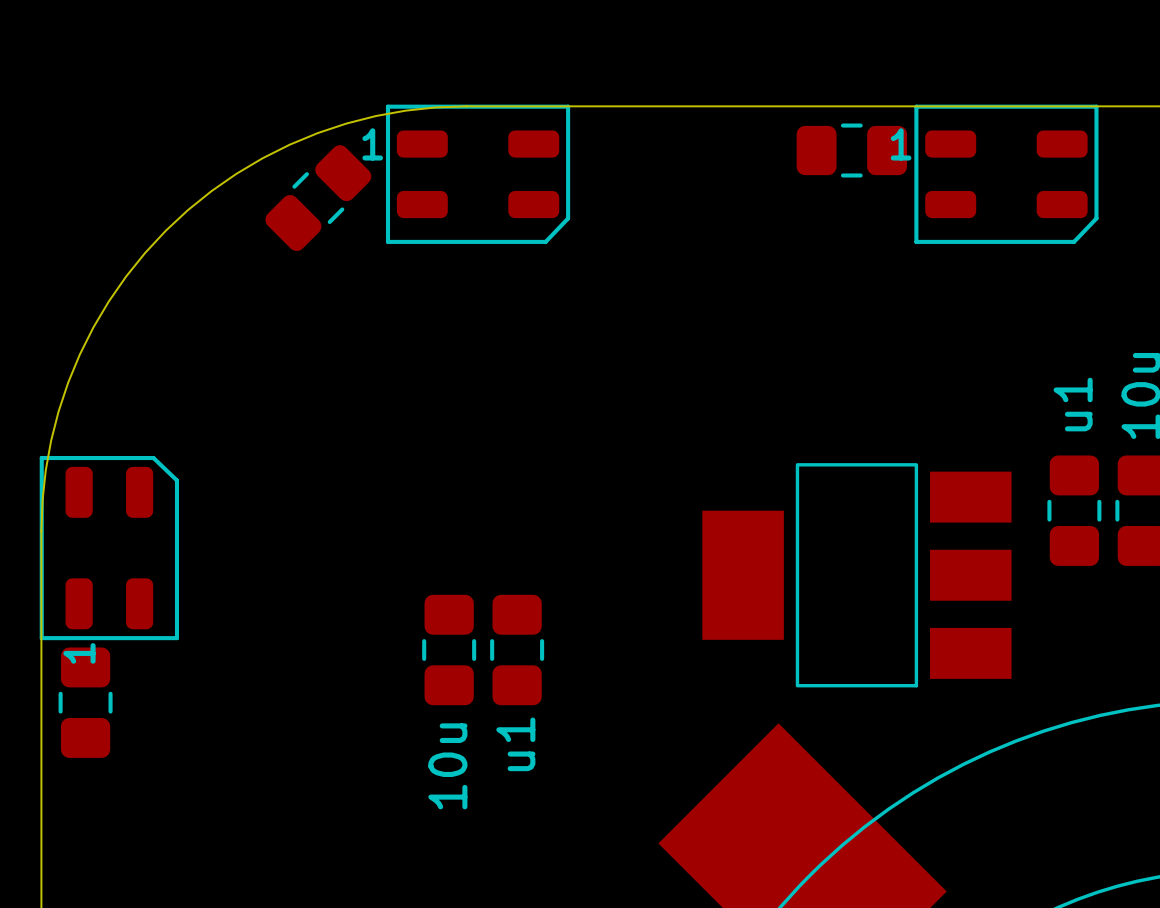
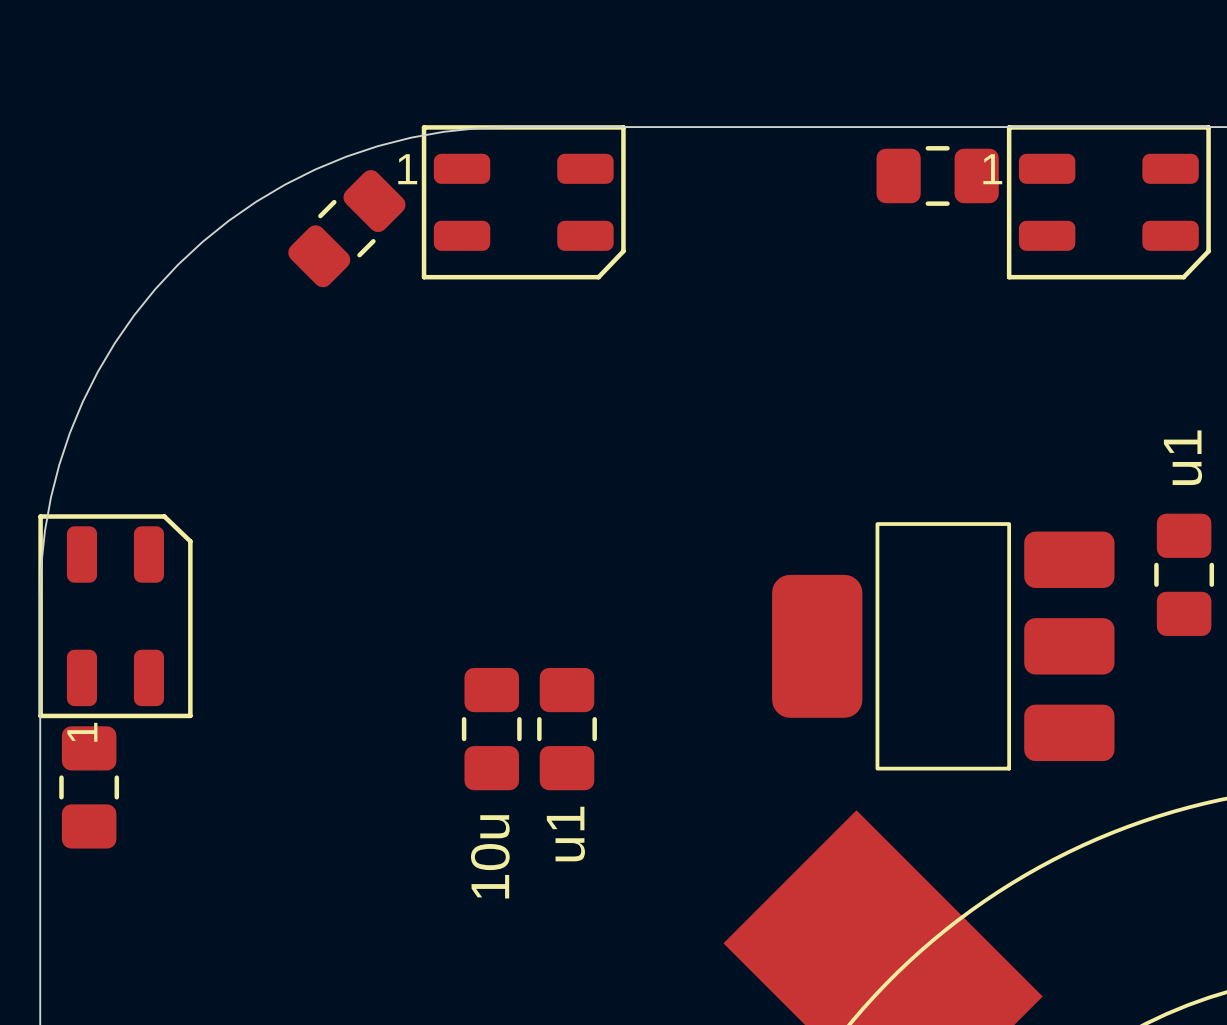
part footprint: [702, 463, 1012, 688] -> [772, 522, 1115, 771]

